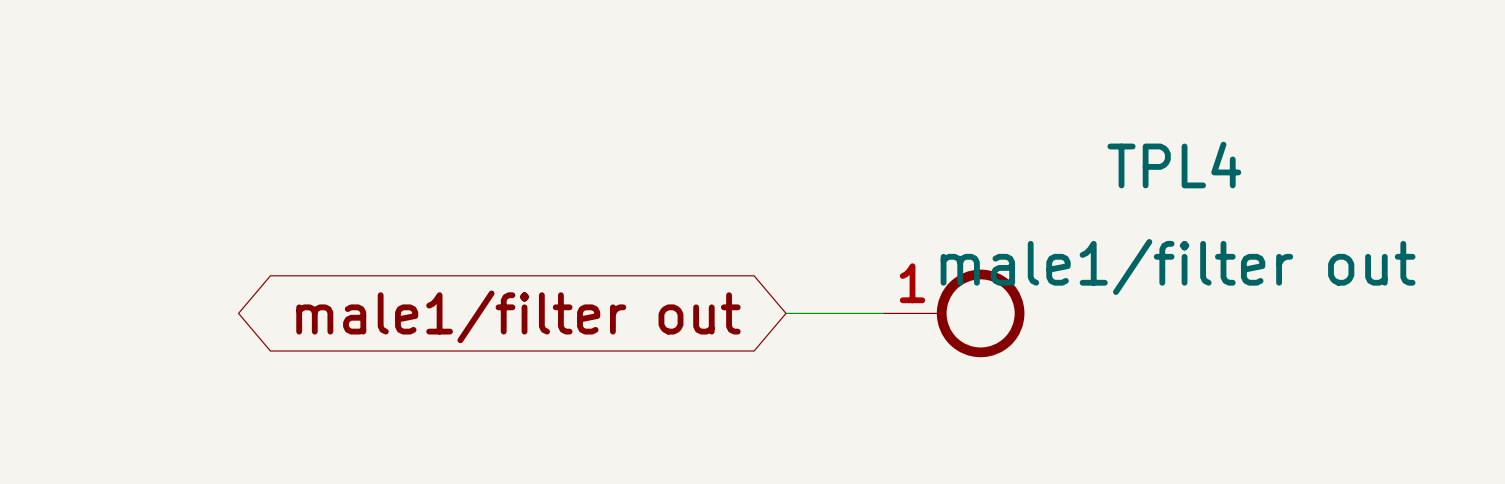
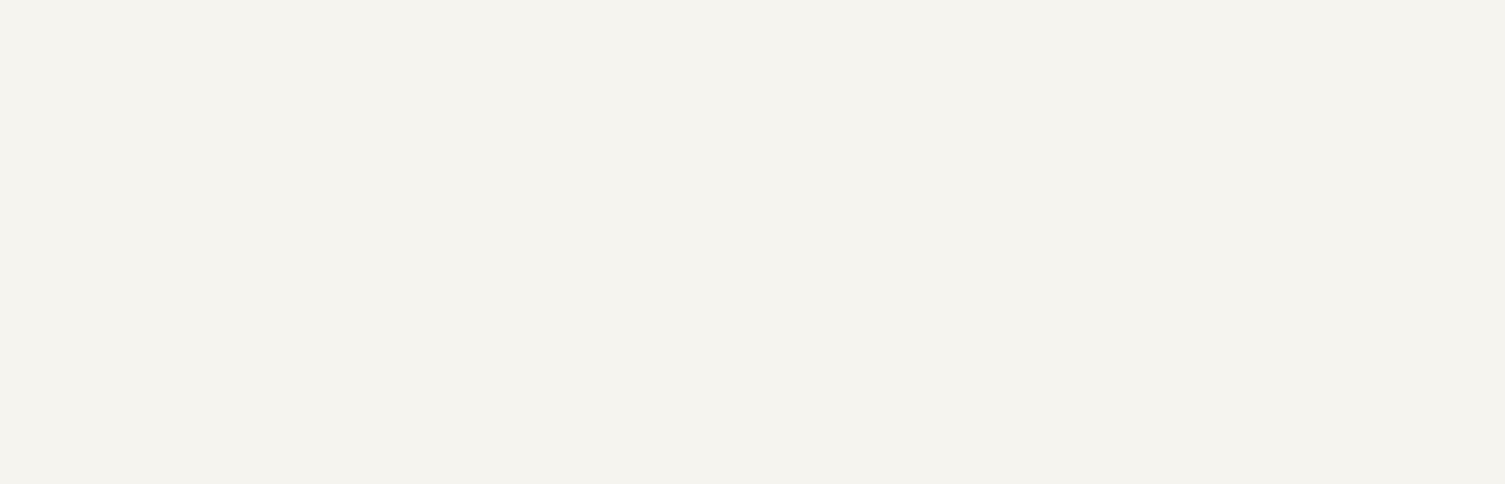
wire: (785, 313) (883, 313) -> none
TPL4: male1/filter out (953, 313) -> none
global label: male1/filter out (518, 316) -> none

